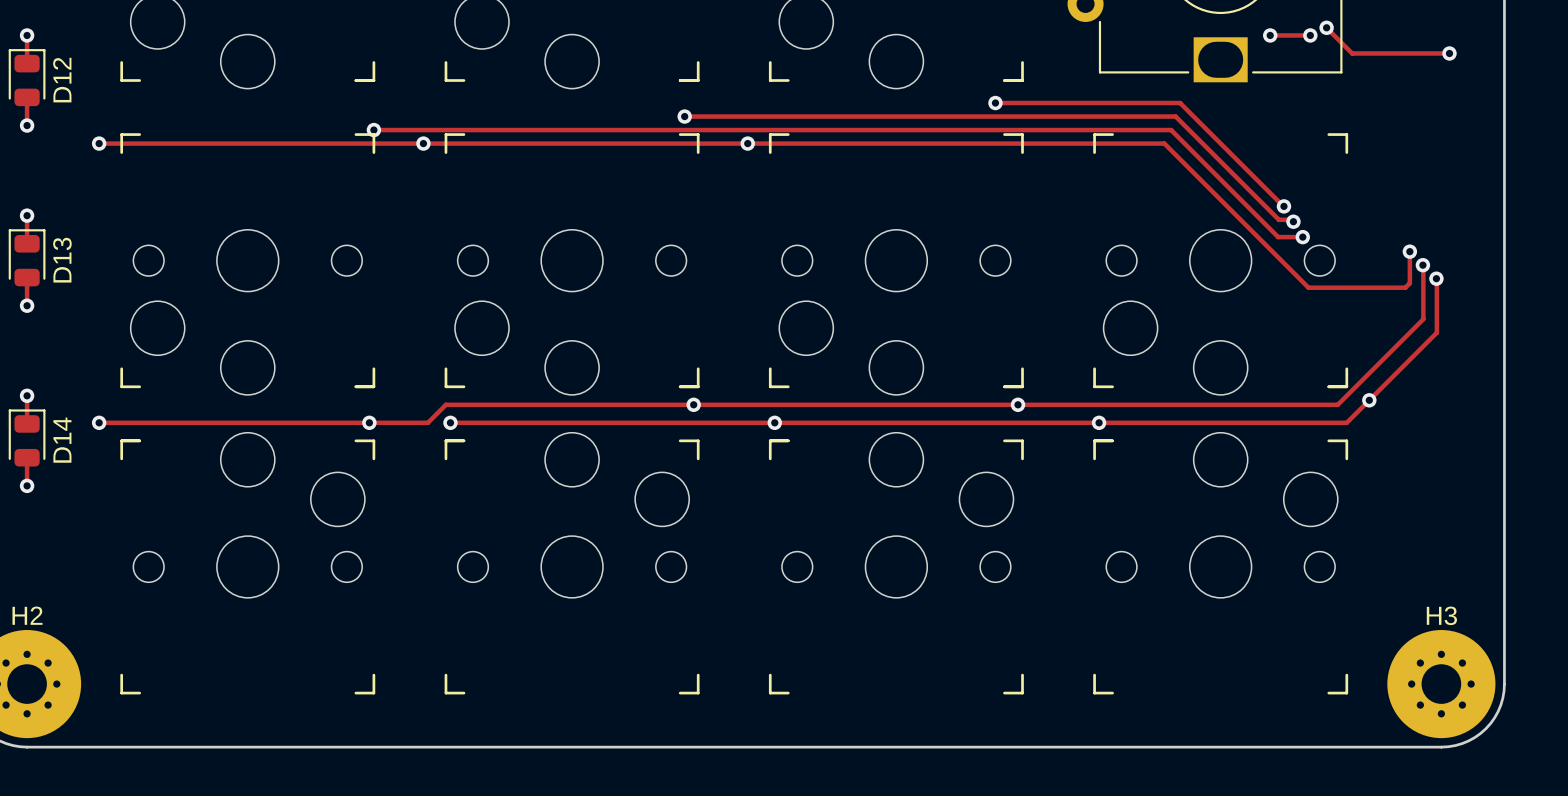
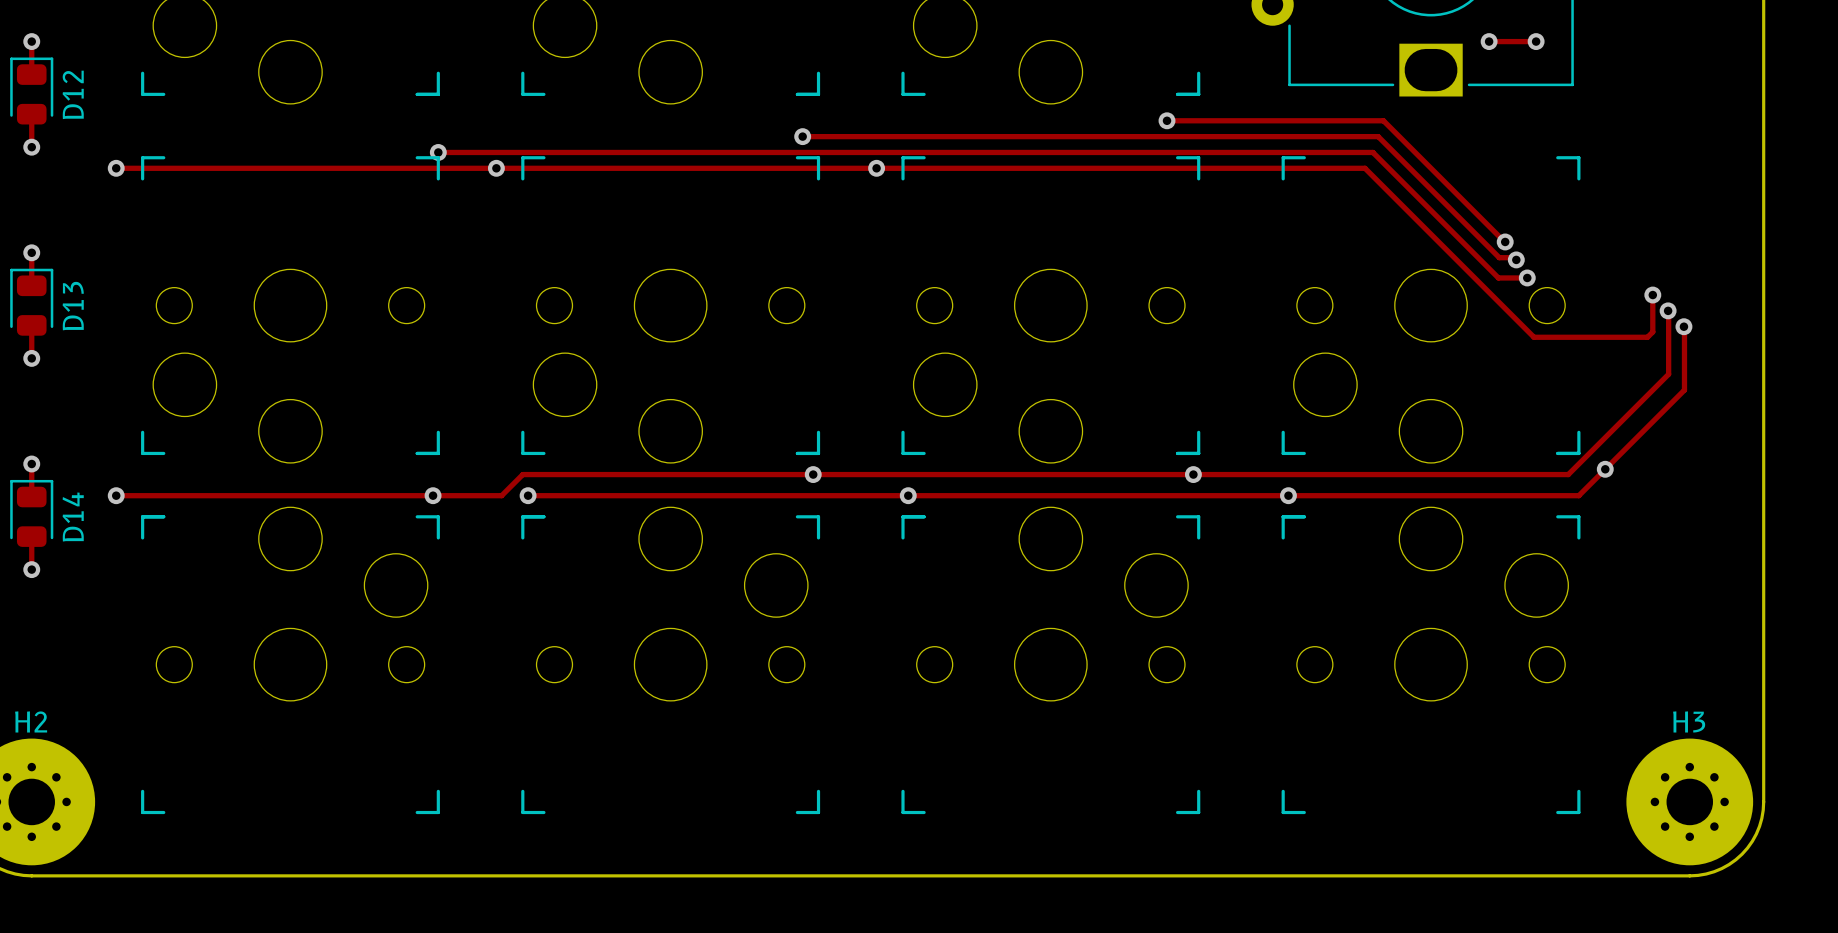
track: (1326, 27) (1352, 53) (1449, 53) -> none
via: (1326, 27) -> none
via: (1449, 53) -> none

